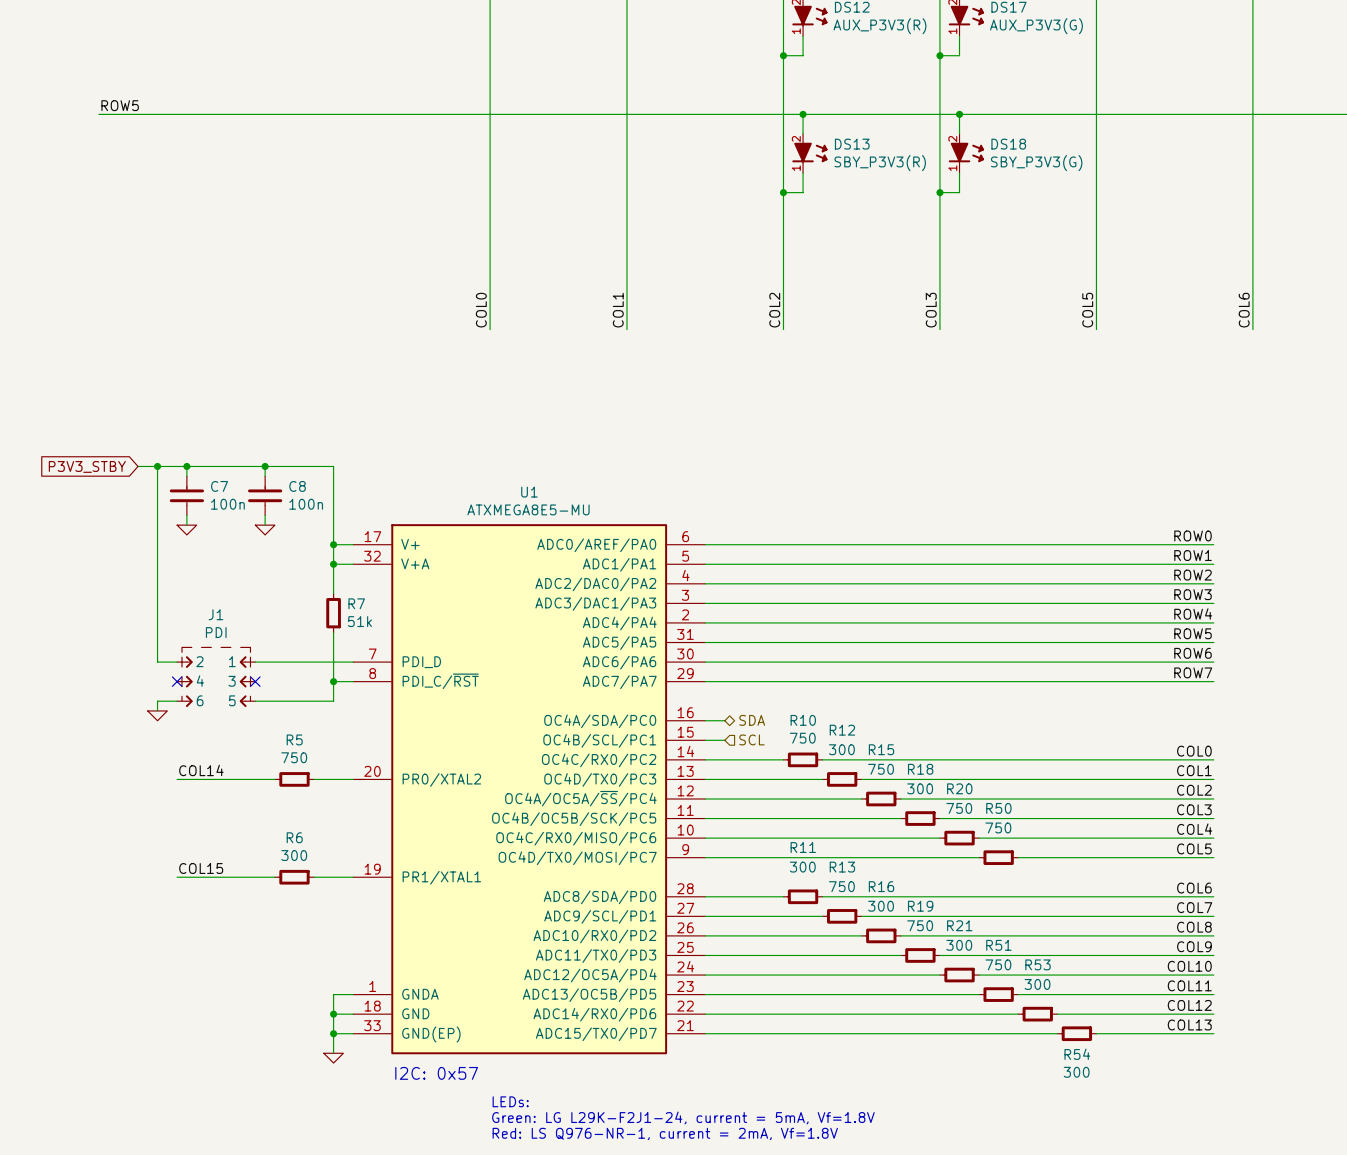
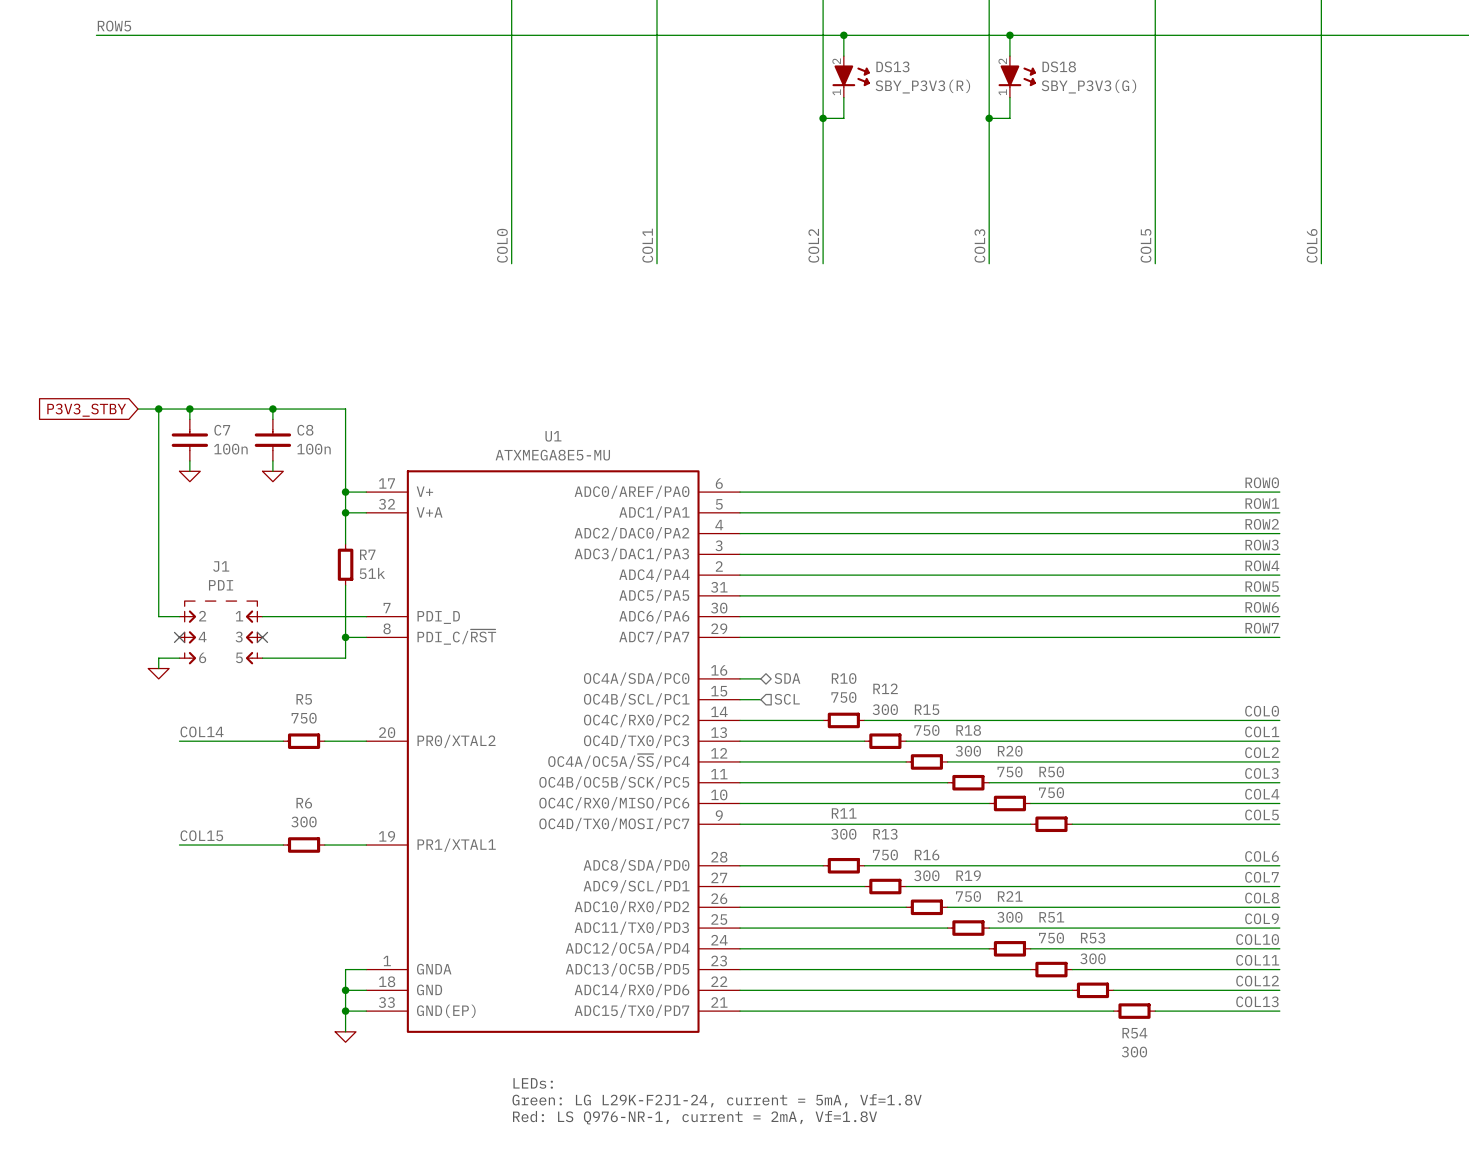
text: I2C: 0x57 (436, 1073) -> none

